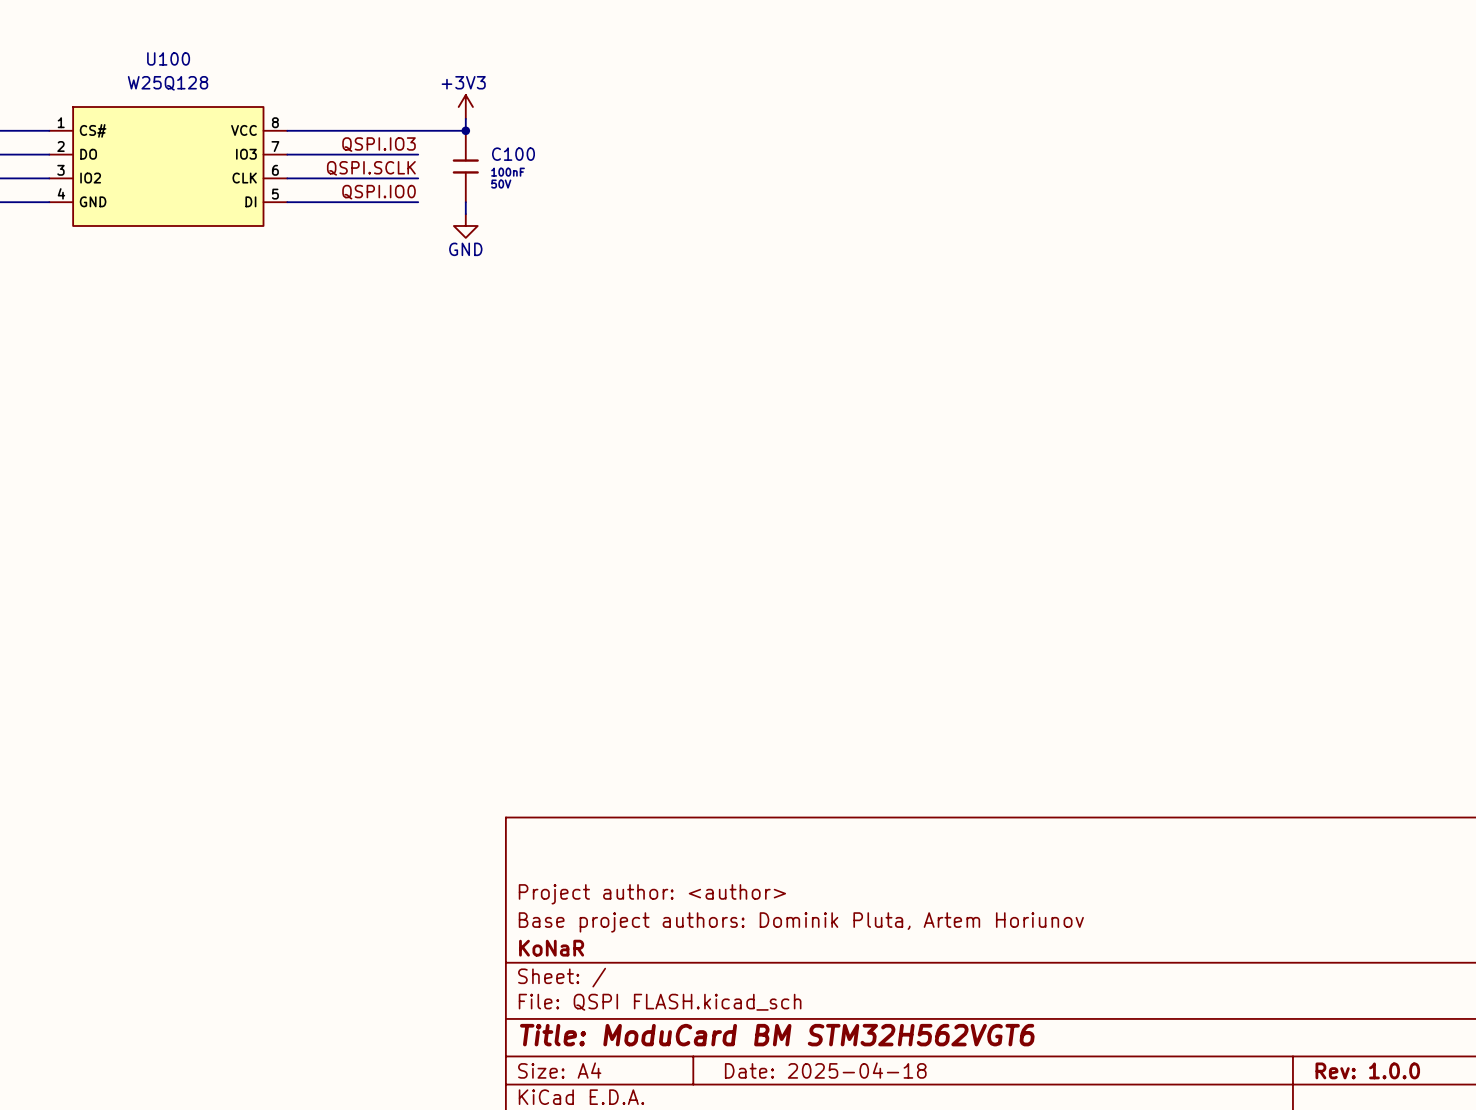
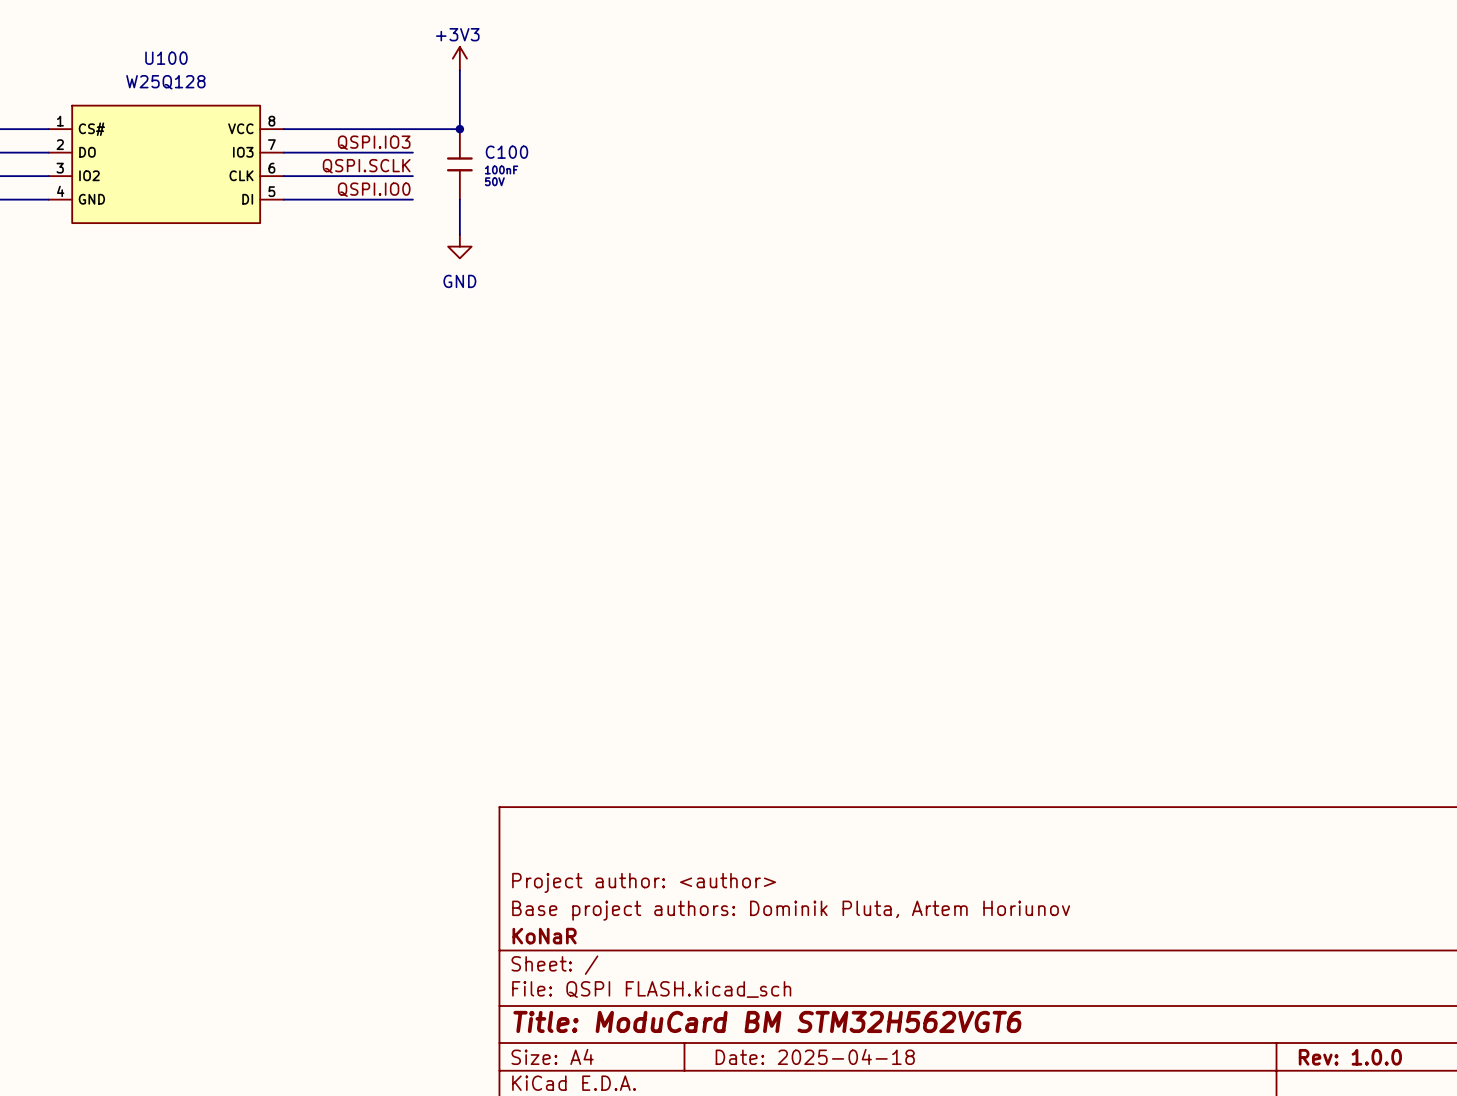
power symbol position: +3V3 (465, 107) -> +3V3 (459, 58)
power symbol position: GND (465, 225) -> GND (459, 246)
power symbol text position: GND (465, 249) -> GND (459, 281)

